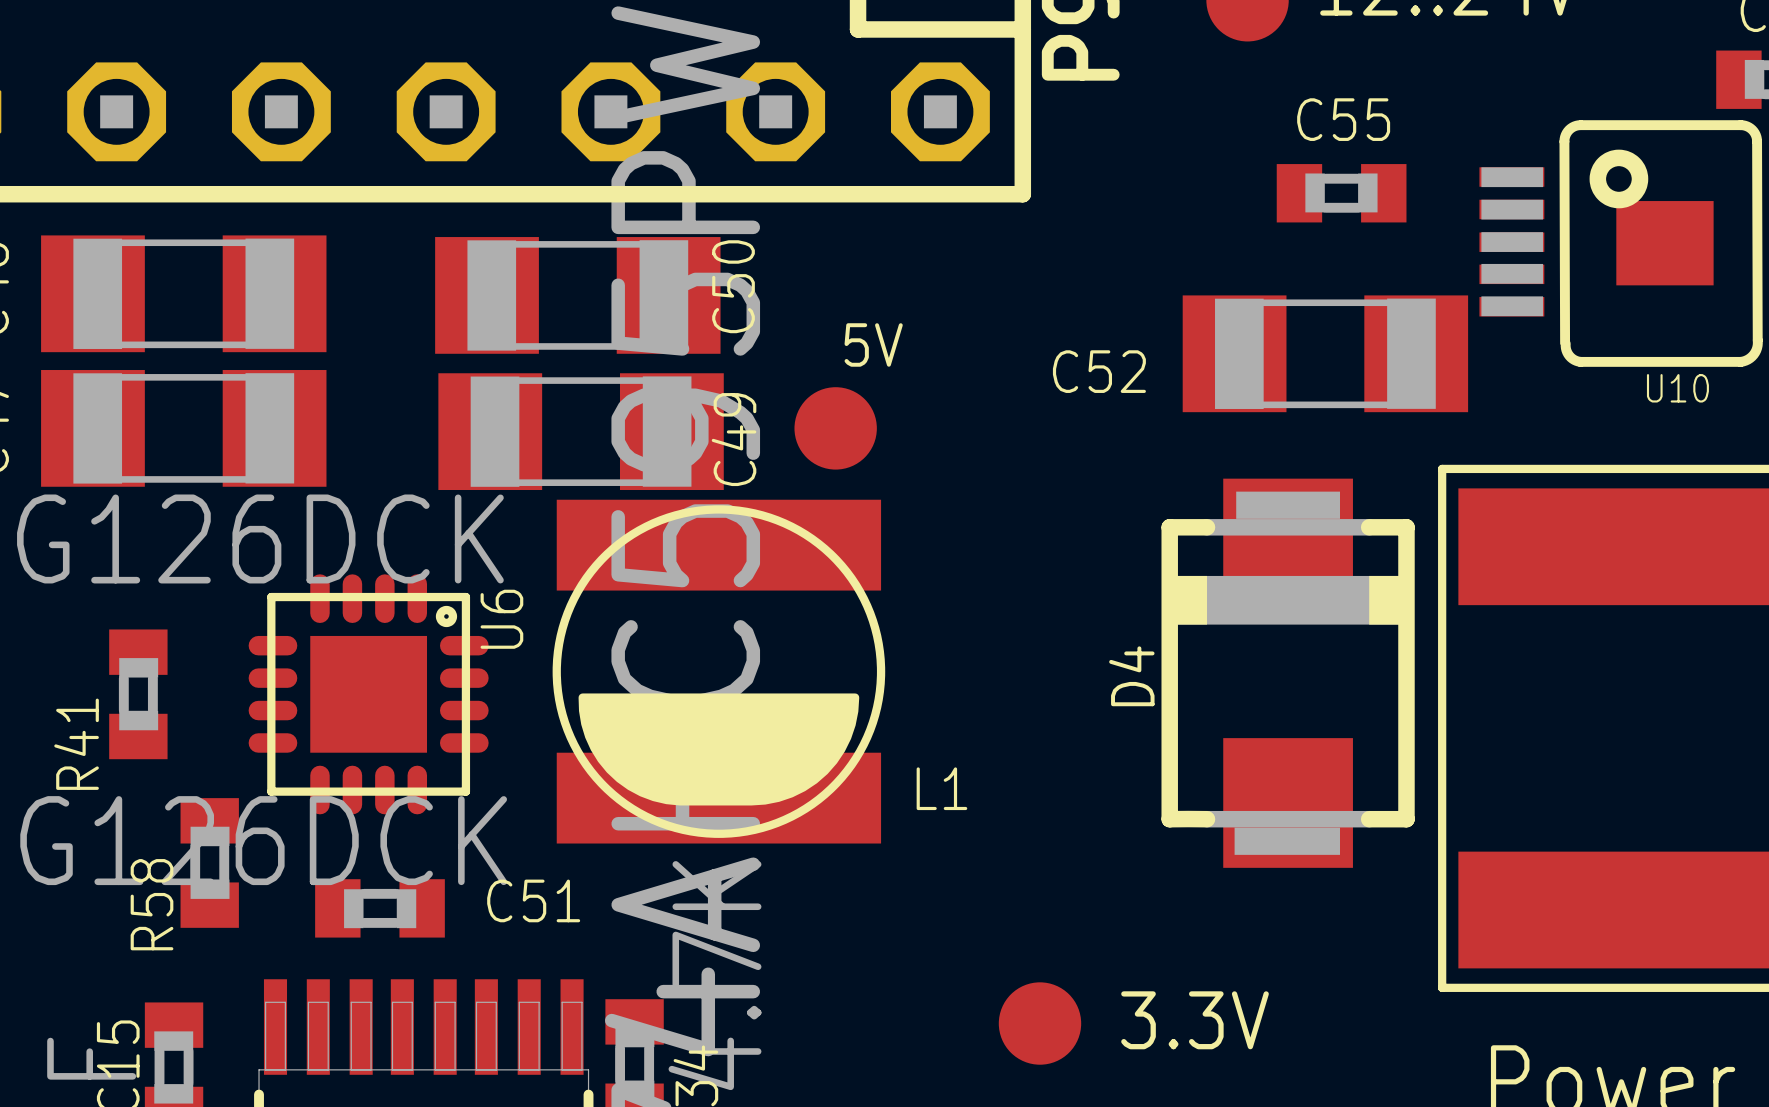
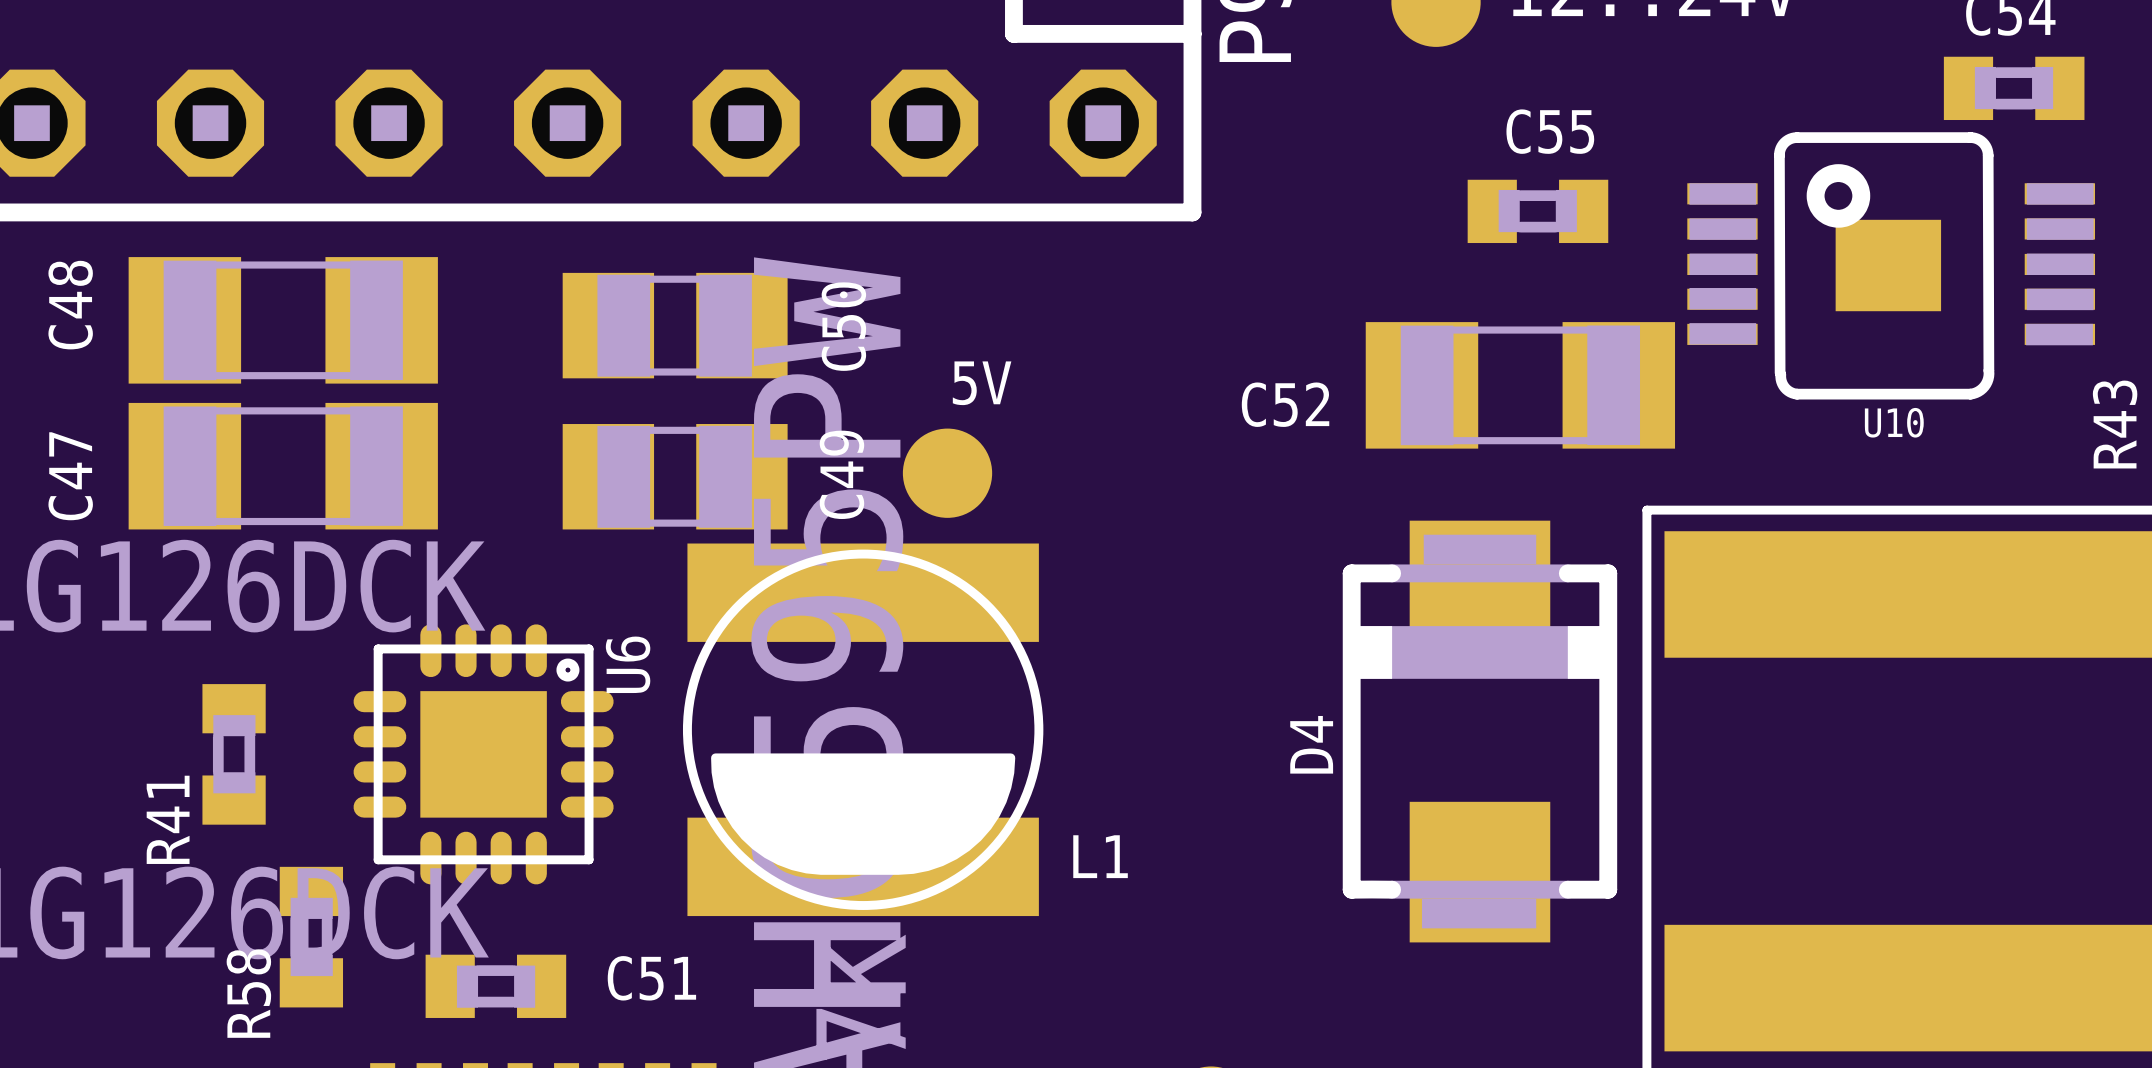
C50 footprint: [435, 237, 721, 354] -> [562, 272, 788, 379]
C49 footprint: [438, 373, 724, 491] -> [562, 424, 788, 530]
5V position: (835, 428) -> (947, 473)

